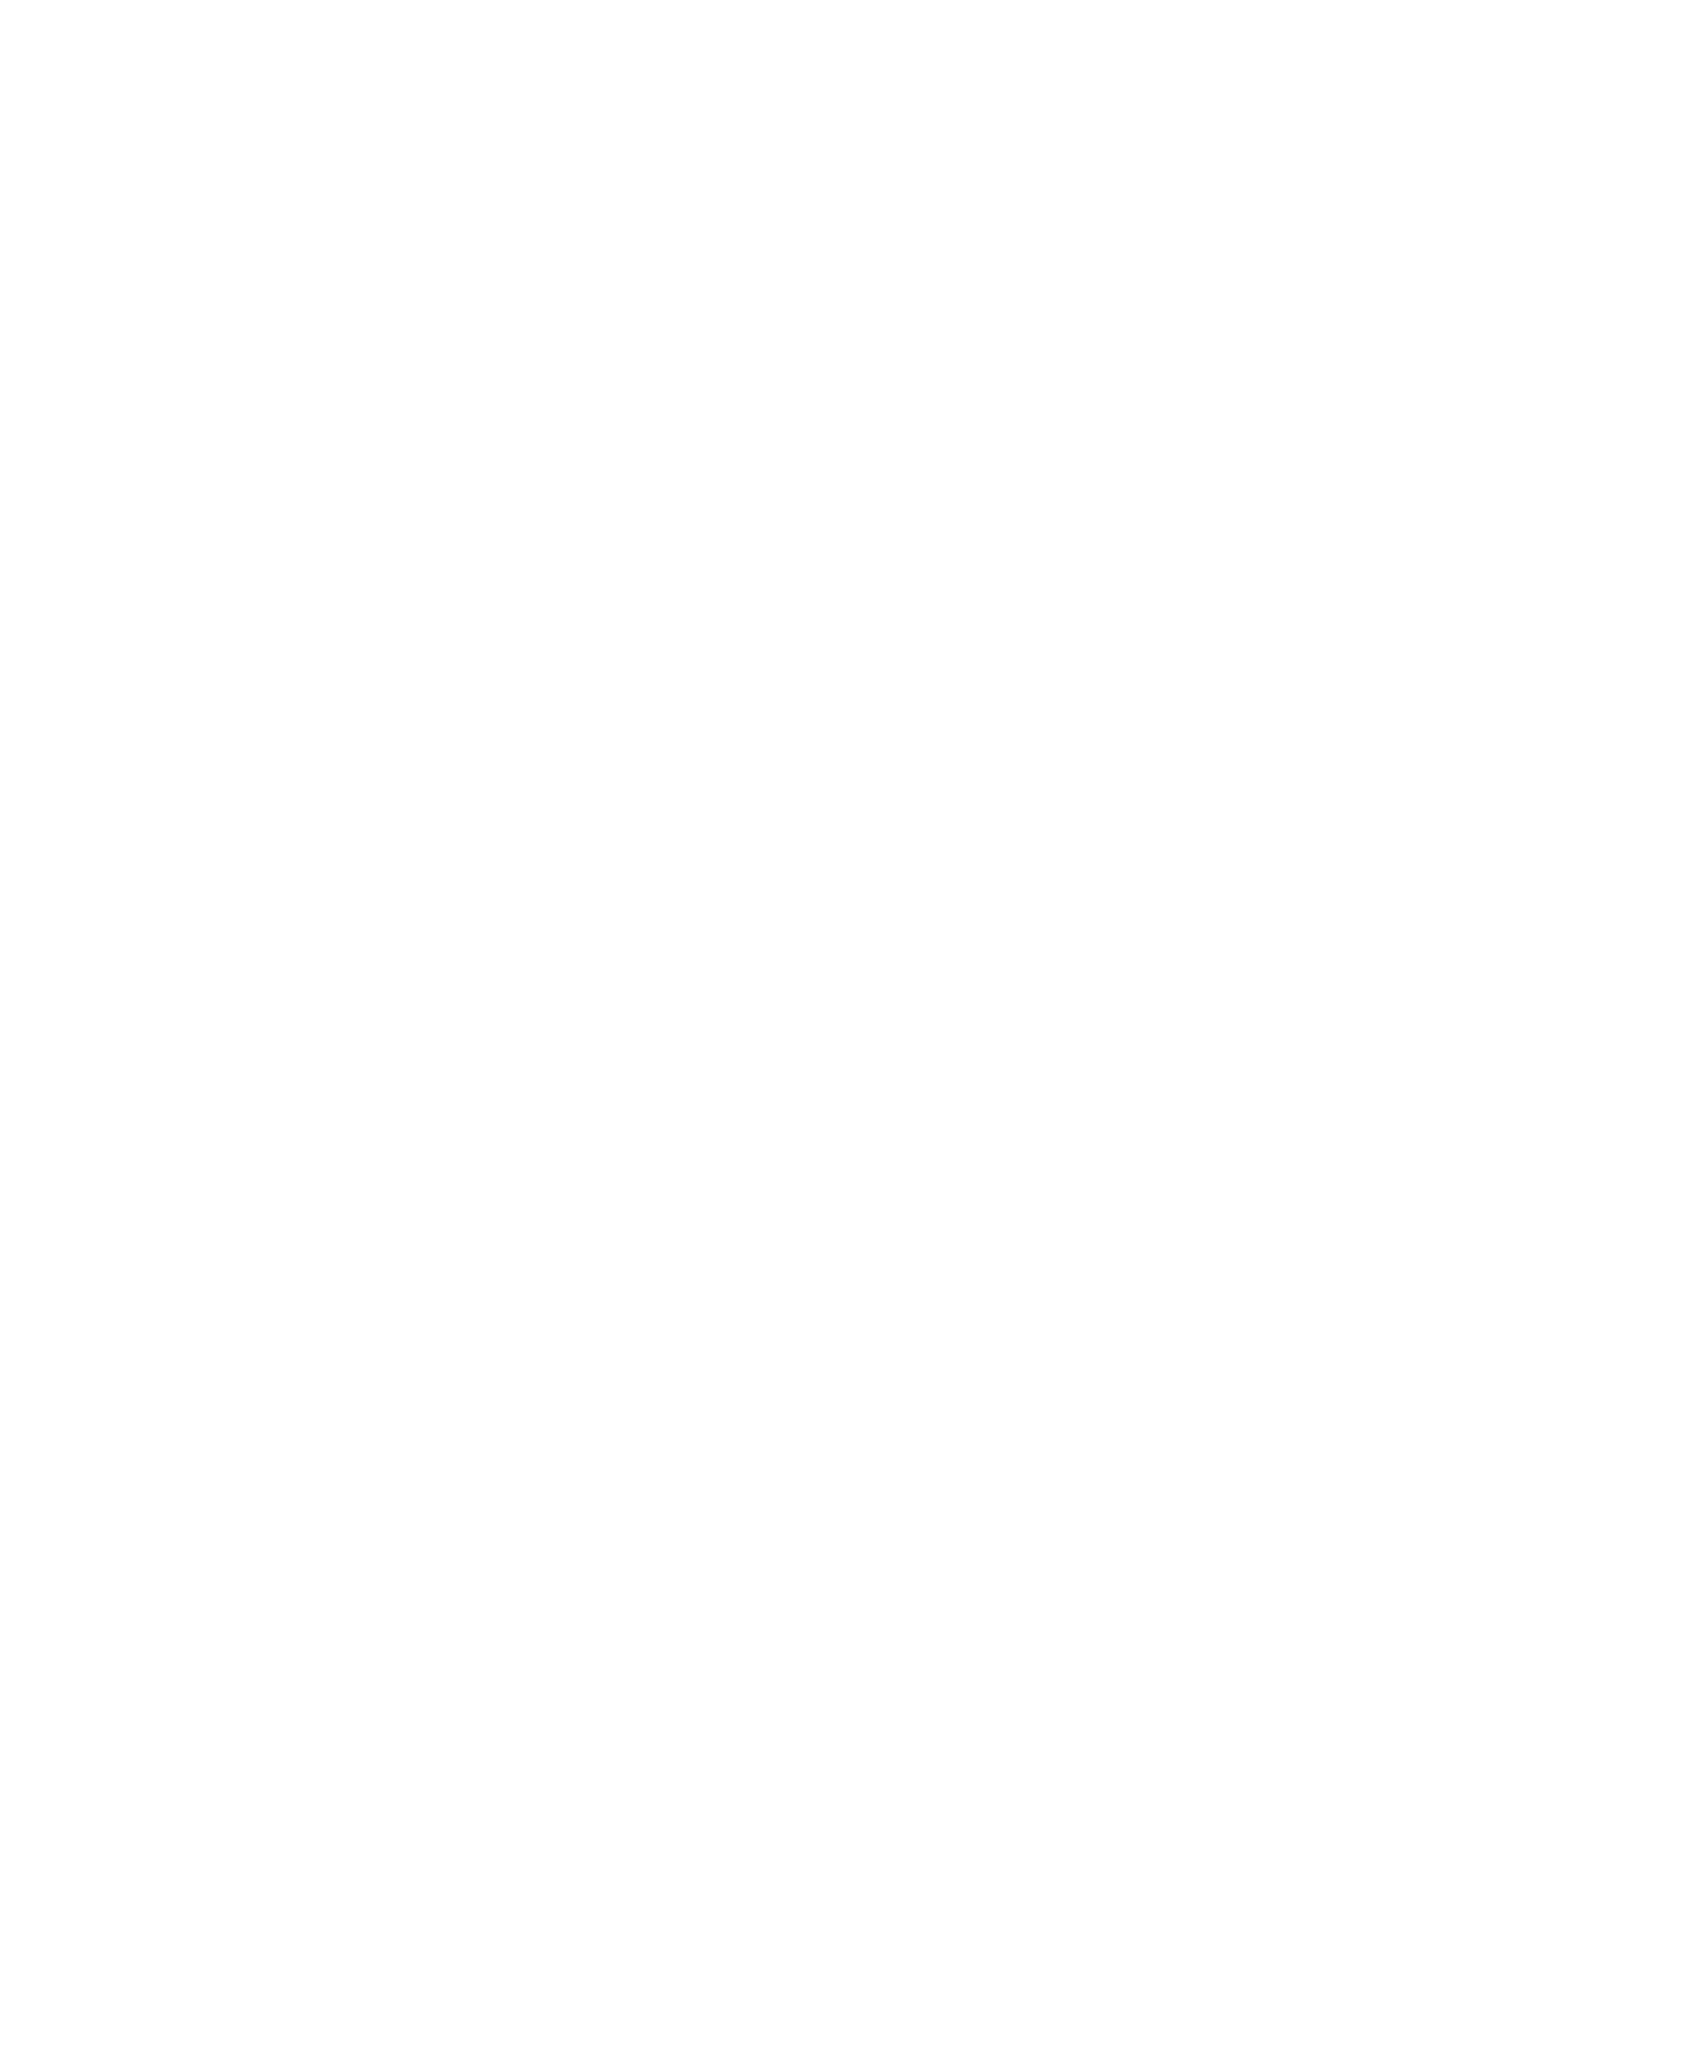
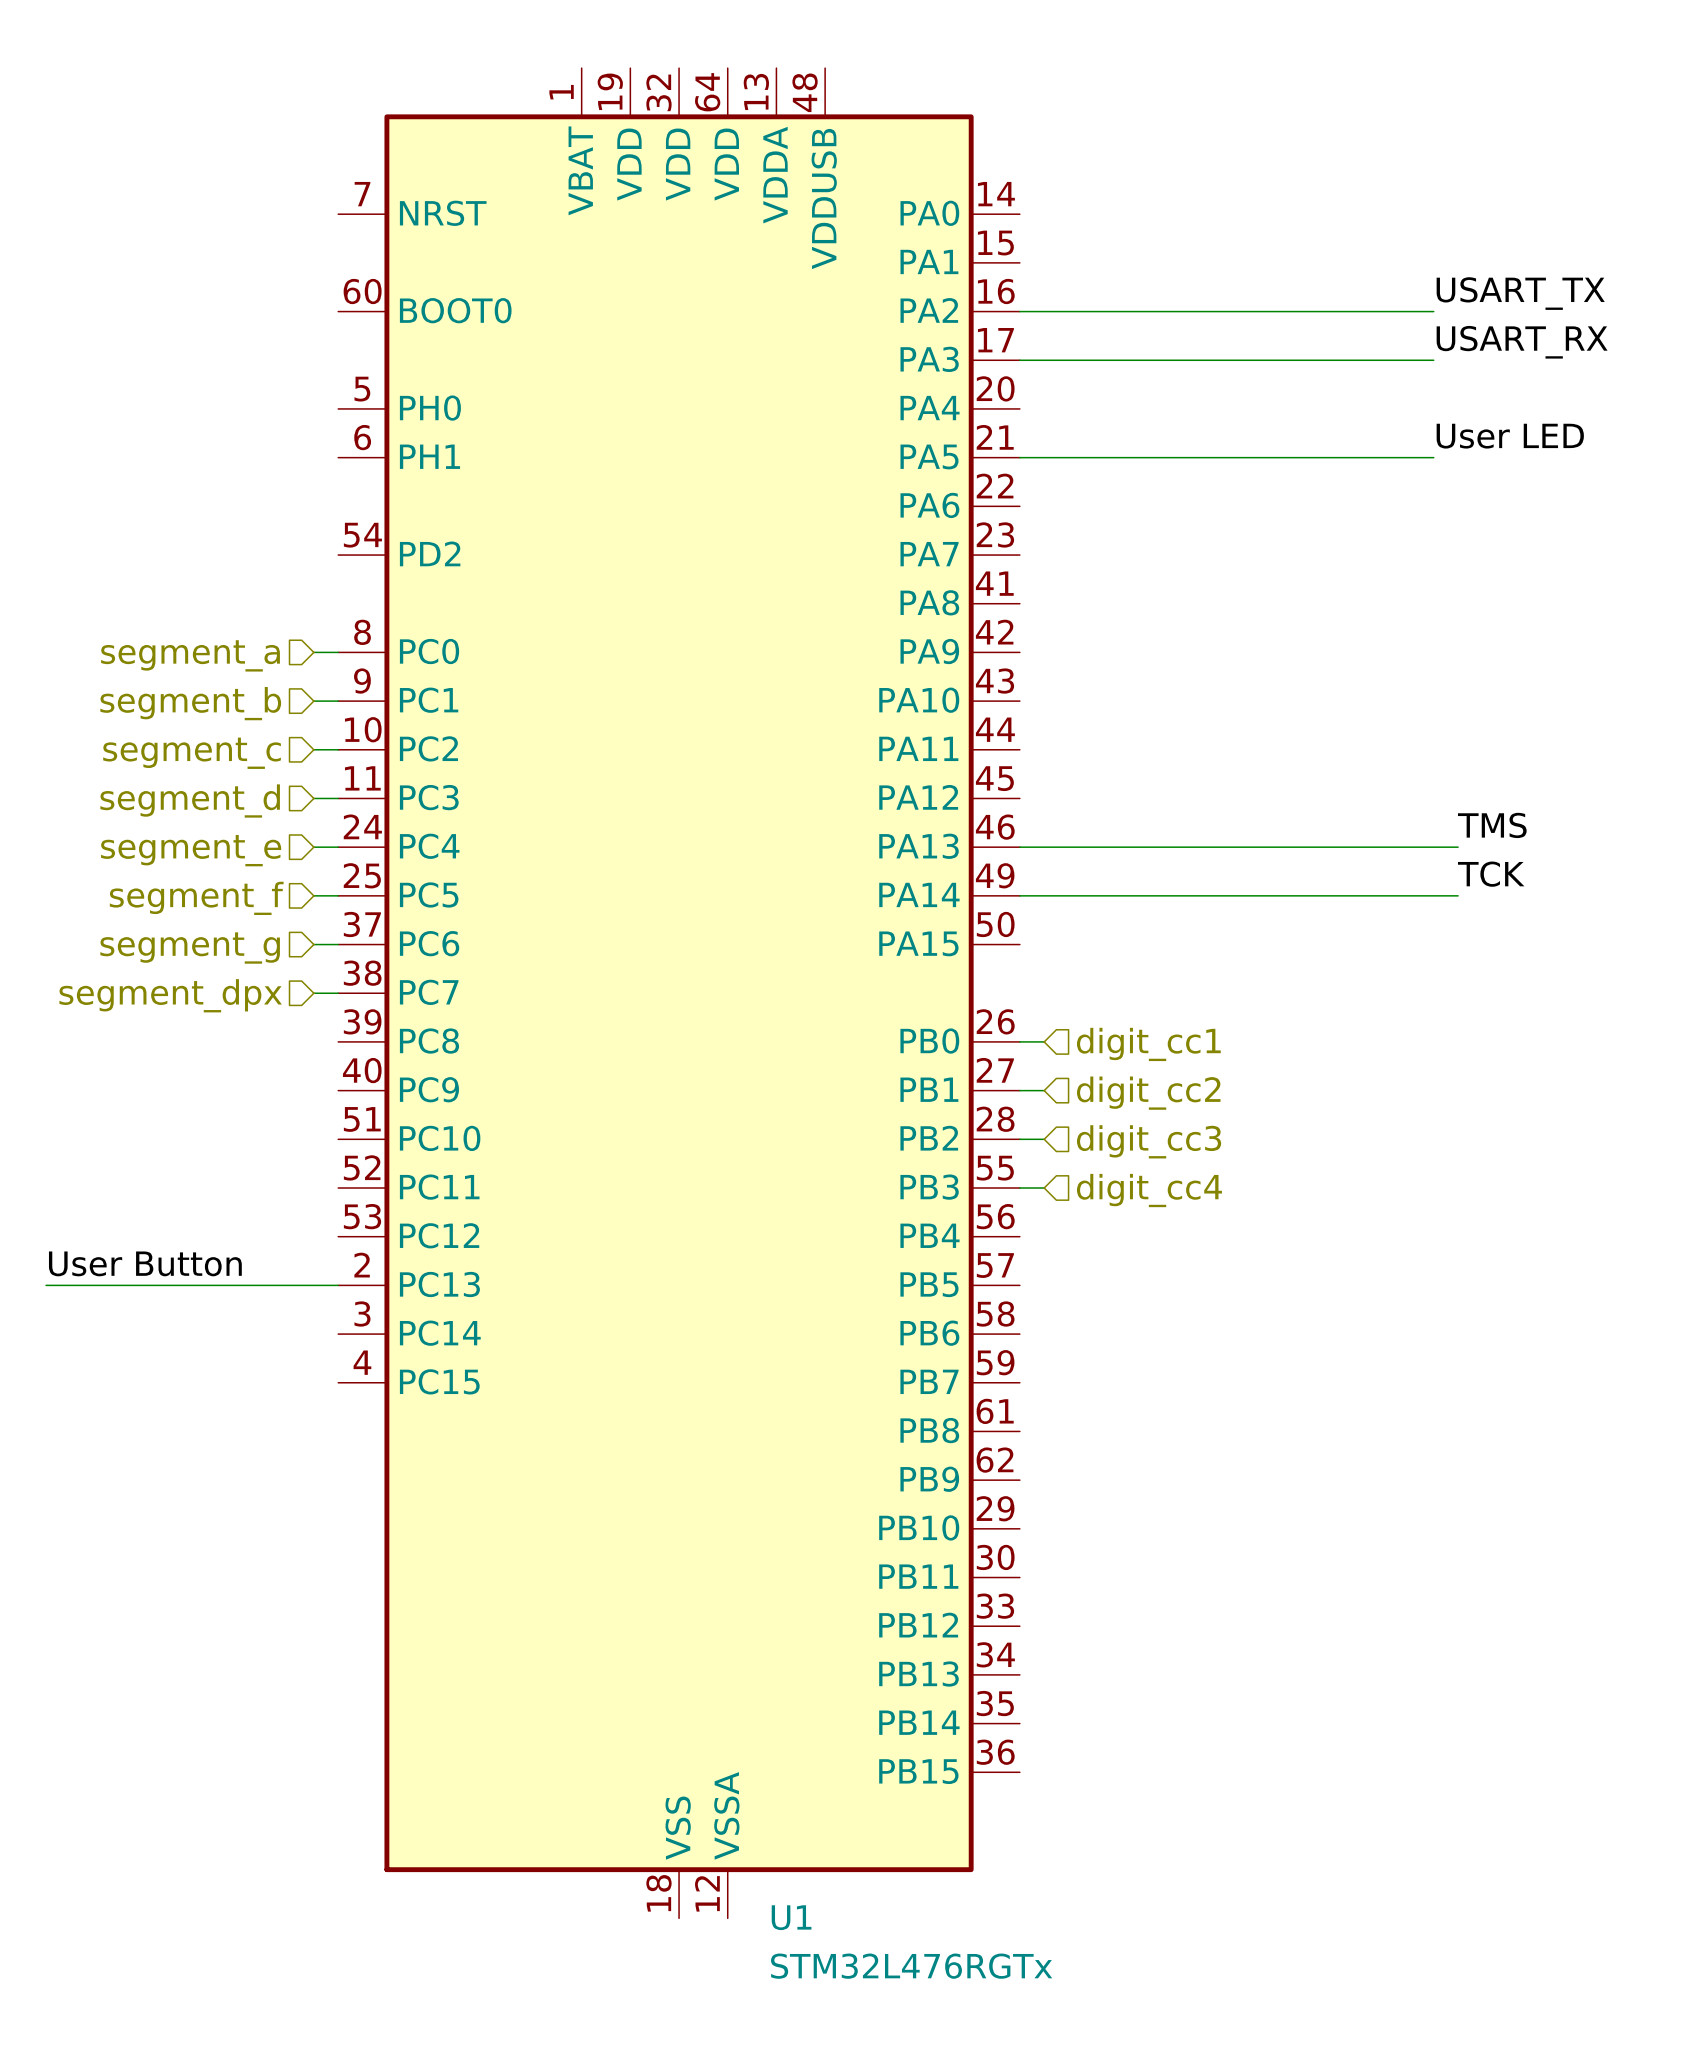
label: none -> USART_TX (1520, 293)
wire: none -> (1019, 311) (1433, 311)
label: none -> USART_RX (1522, 342)
wire: none -> (1019, 360) (1433, 360)
label: none -> User LED (1510, 436)
wire: none -> (1019, 457) (1433, 457)
wire: none -> (313, 652) (338, 652)
hierarchical label: none -> segment_a (190, 655)
wire: none -> (313, 701) (338, 701)
hierarchical label: none -> segment_b (190, 703)
wire: none -> (313, 749) (338, 749)
hierarchical label: none -> segment_c (192, 753)
wire: none -> (313, 798) (338, 798)
hierarchical label: none -> segment_d (190, 800)
label: none -> TMS (1492, 825)
wire: none -> (313, 847) (338, 847)
wire: none -> (1019, 847) (1458, 847)
hierarchical label: none -> segment_e (191, 850)
label: none -> TCK (1491, 874)
wire: none -> (313, 895) (338, 895)
wire: none -> (1019, 895) (1458, 895)
hierarchical label: none -> segment_f (196, 898)
wire: none -> (313, 944) (338, 944)
hierarchical label: none -> segment_g (190, 948)
wire: none -> (313, 993) (338, 993)
U1: none -> STM32L476RGTx (679, 993)
hierarchical label: none -> segment_dpx (170, 995)
wire: none -> (1019, 1041) (1044, 1041)
hierarchical label: none -> digit_cc1 (1148, 1044)
wire: none -> (1019, 1090) (1044, 1090)
hierarchical label: none -> digit_cc2 (1148, 1093)
wire: none -> (1019, 1139) (1044, 1139)
hierarchical label: none -> digit_cc3 (1149, 1141)
wire: none -> (1019, 1188) (1044, 1188)
hierarchical label: none -> digit_cc4 (1149, 1190)
label: none -> User Button (145, 1263)
wire: none -> (46, 1285) (338, 1285)

